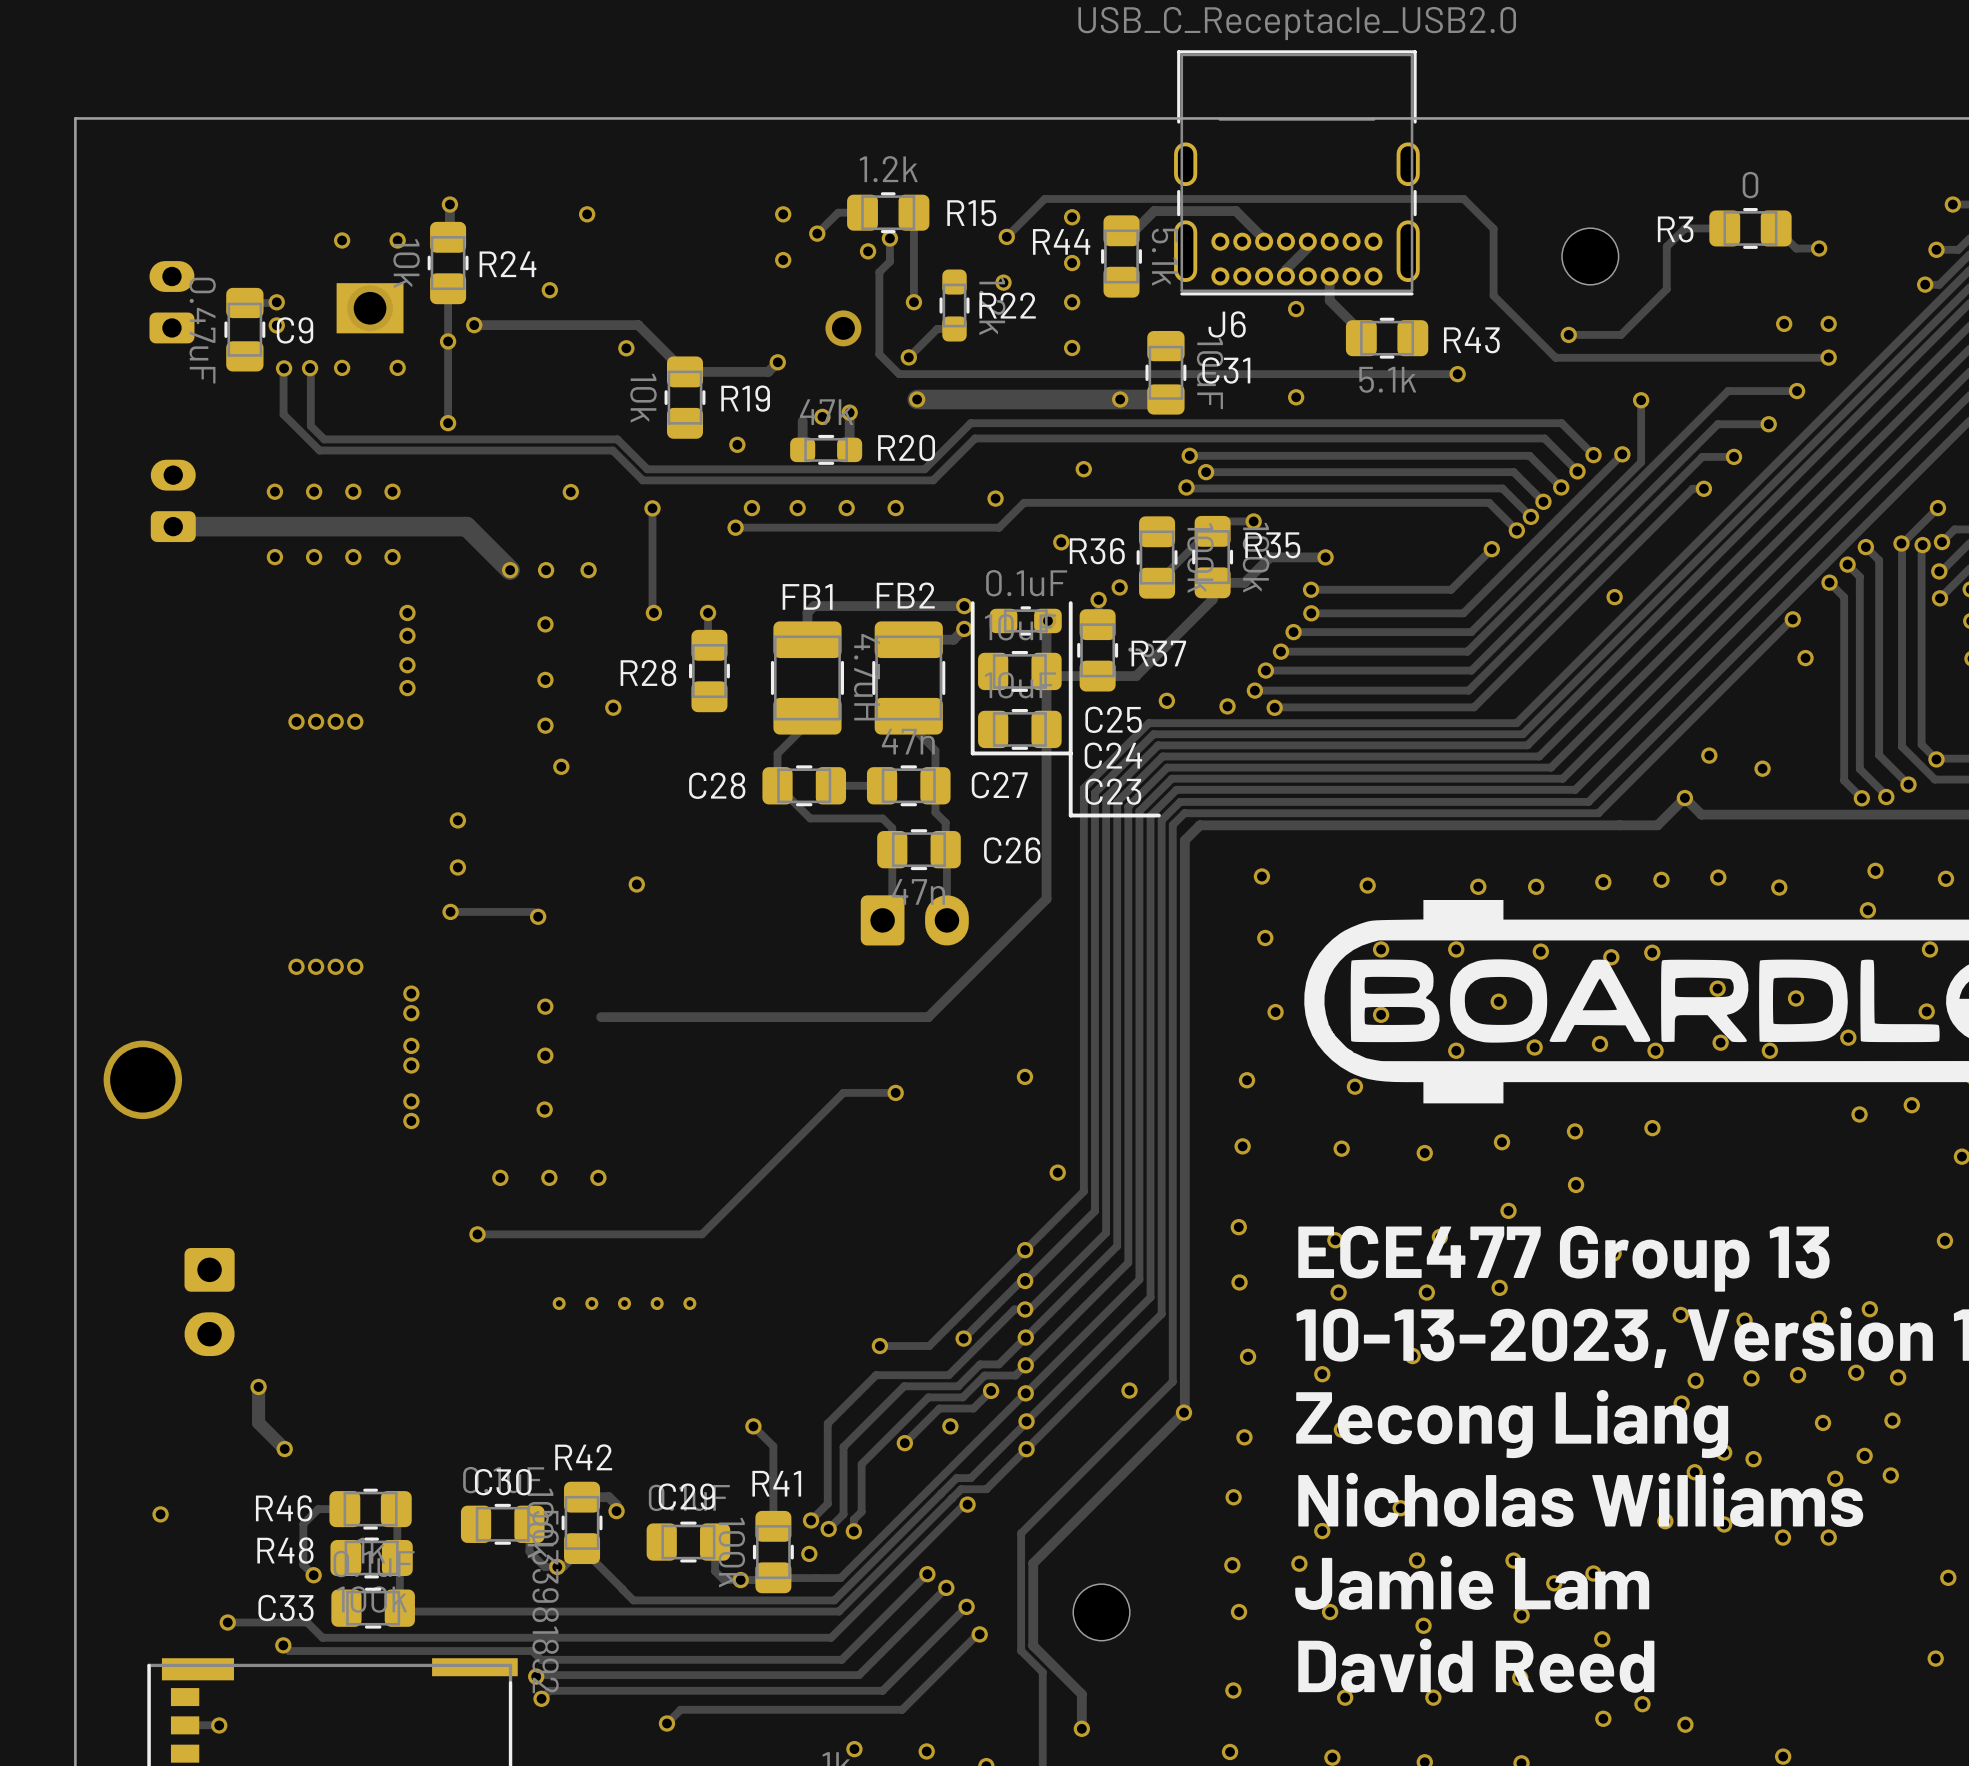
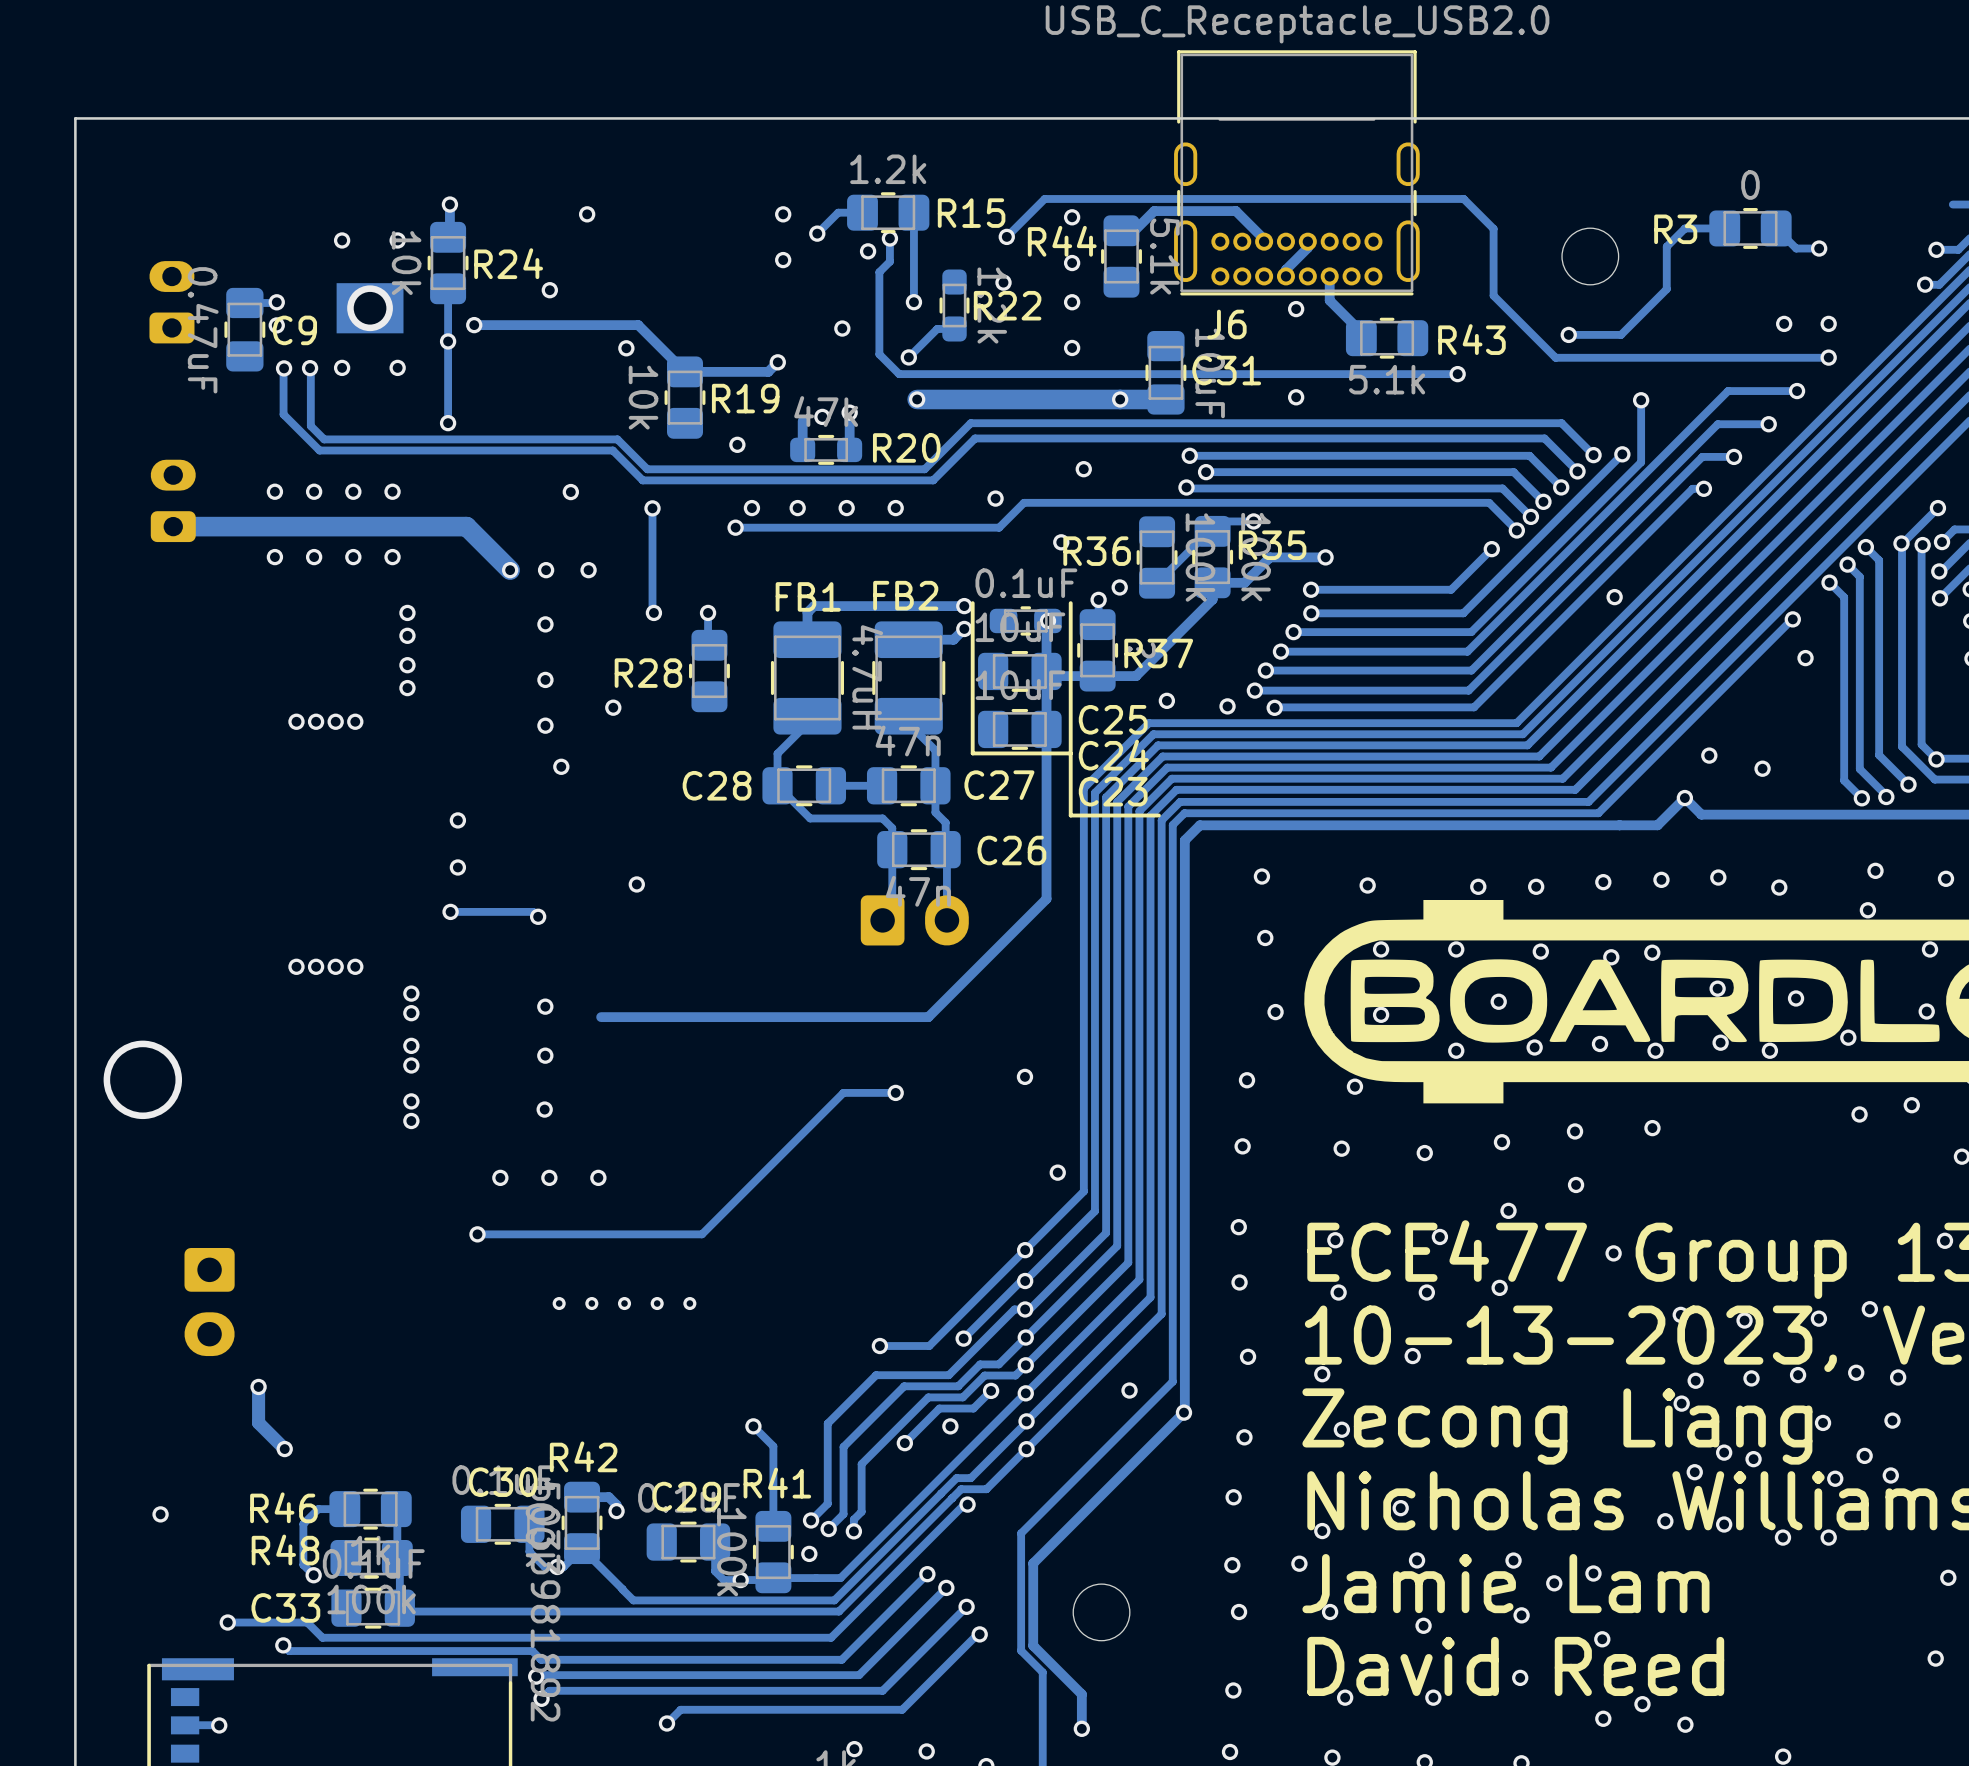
via: (1952, 204) -> none
via size: [825, 310, 862, 347] -> [834, 320, 851, 337]

